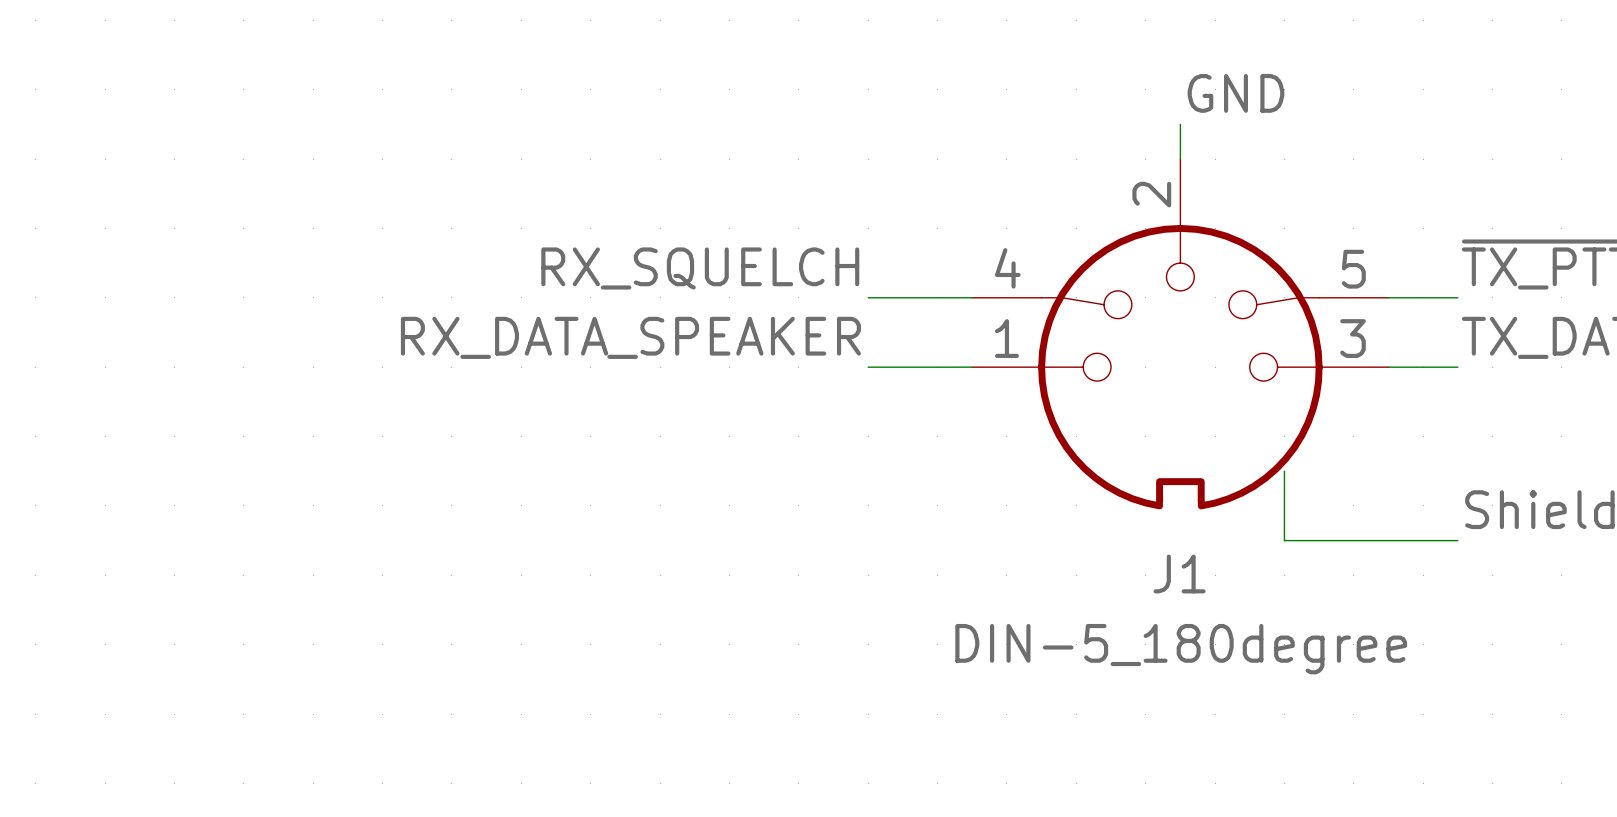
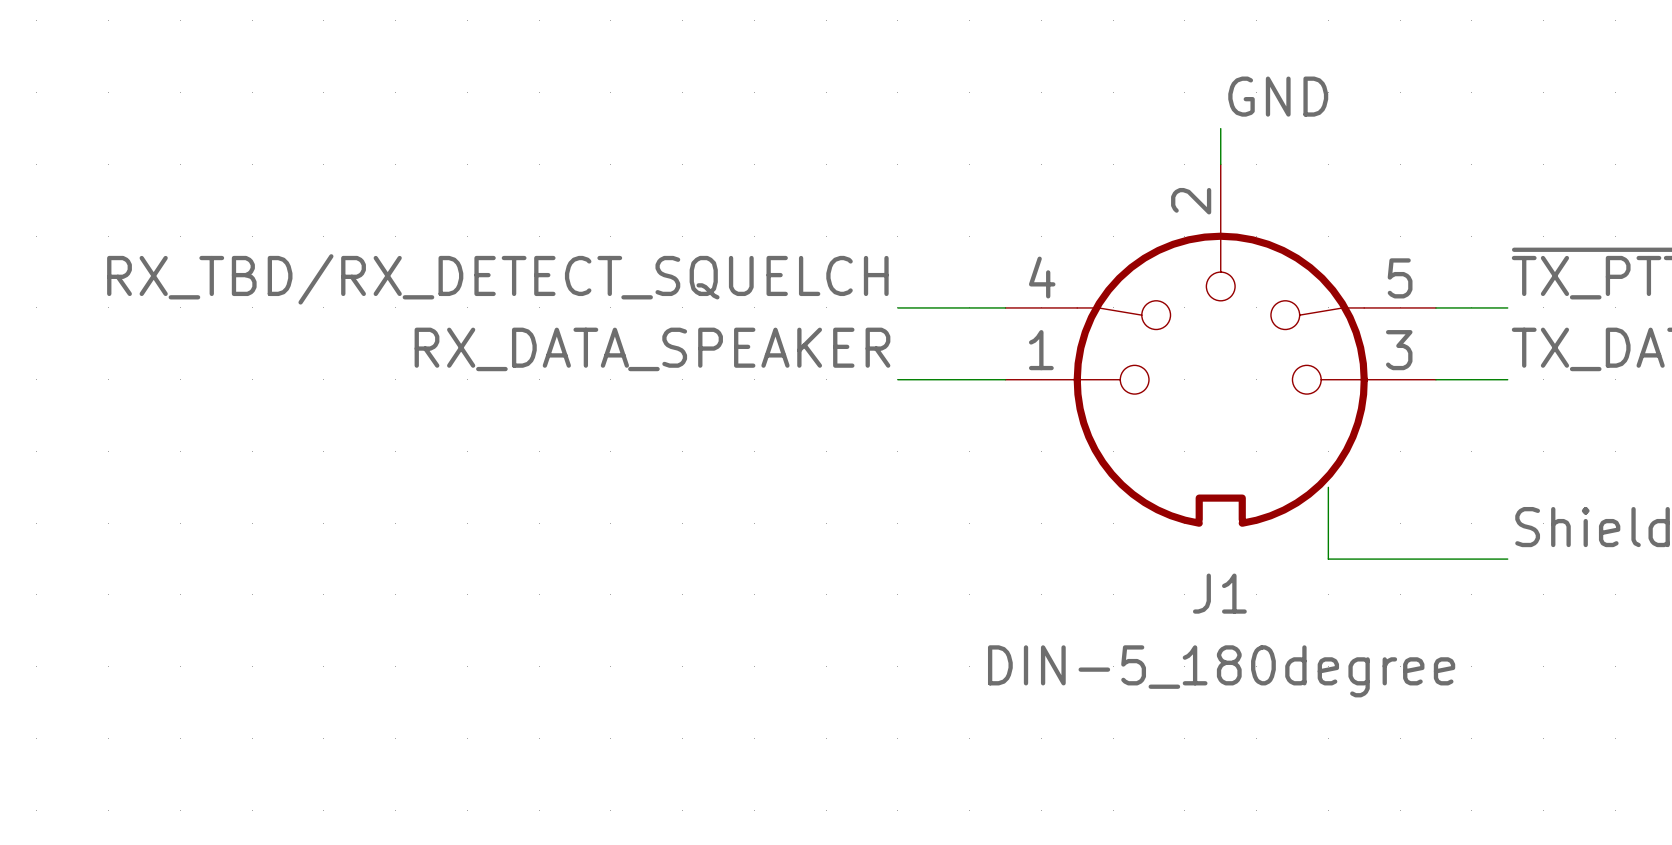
label: RX_SQUELCH (700, 268) -> RX_TBD/RX_DETECT_SQUELCH (497, 279)

